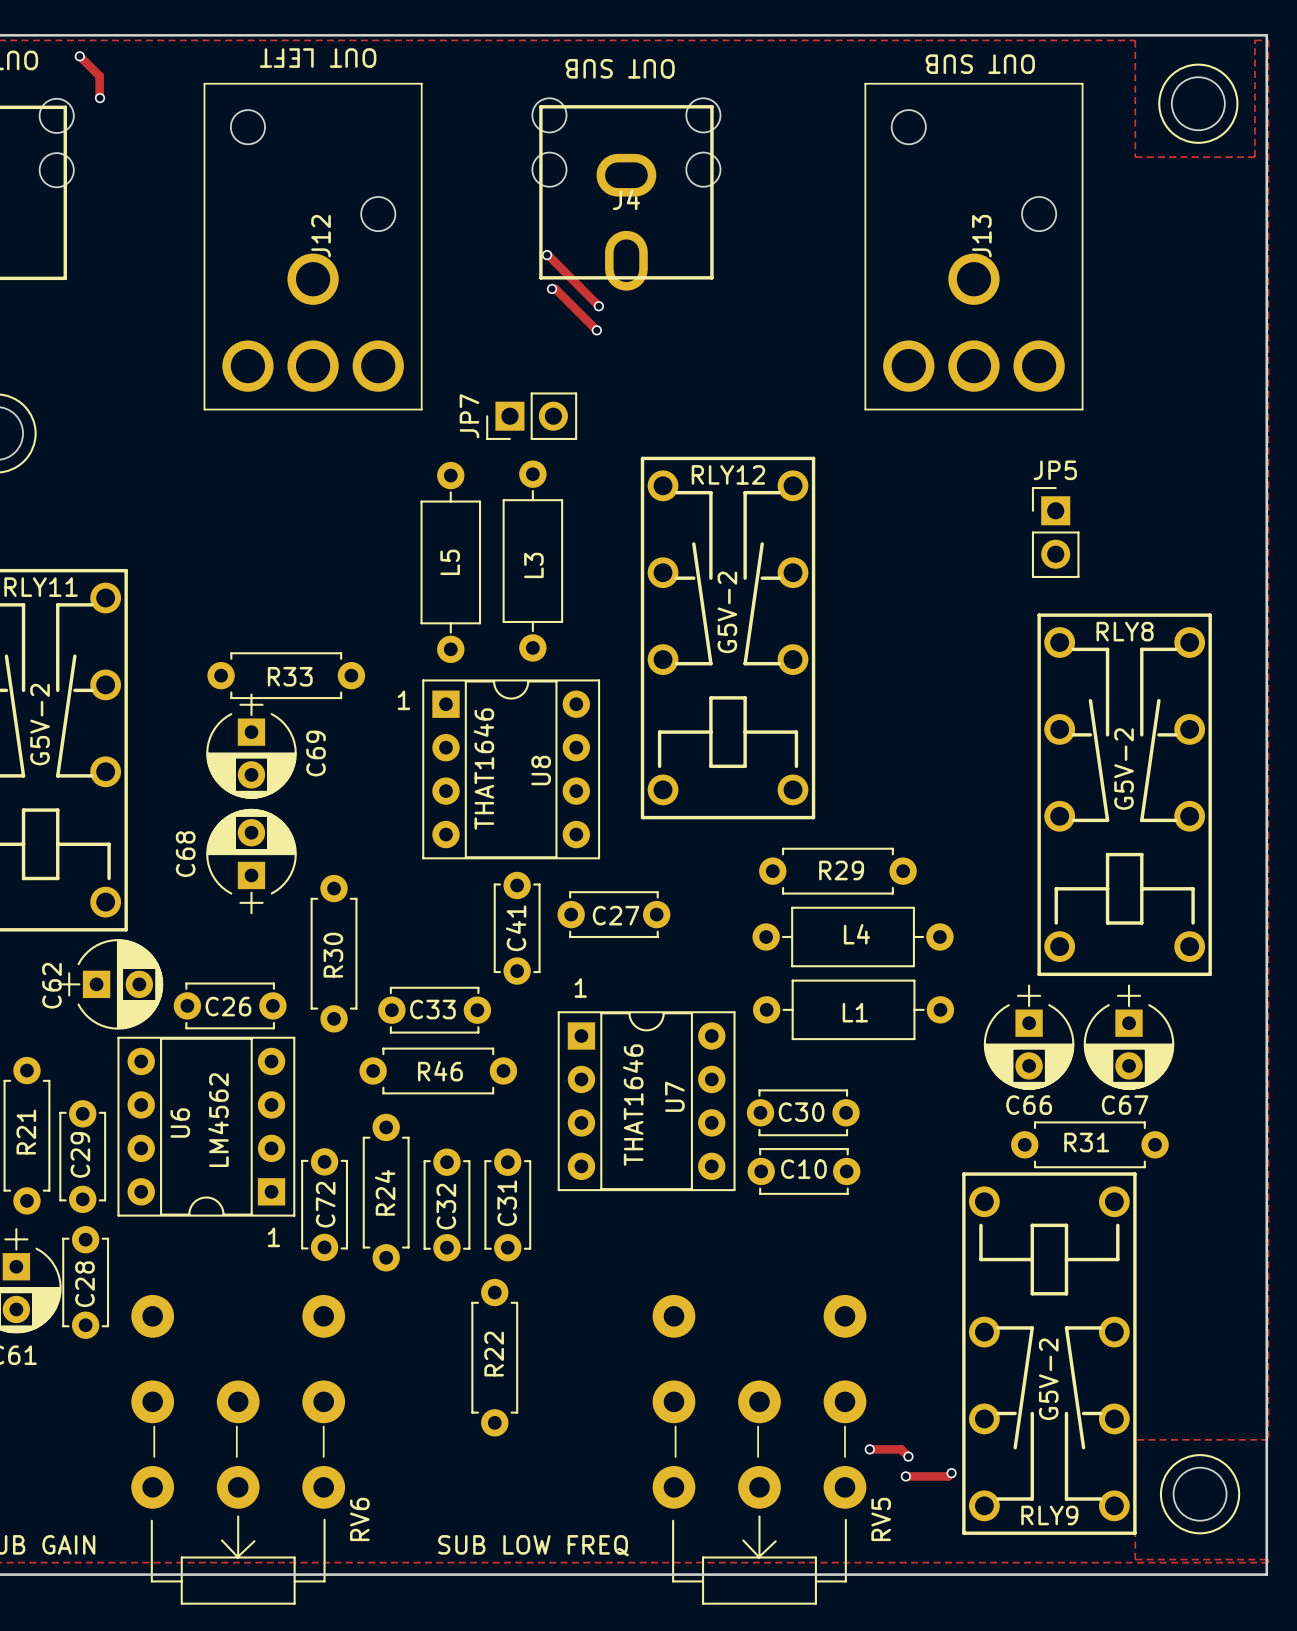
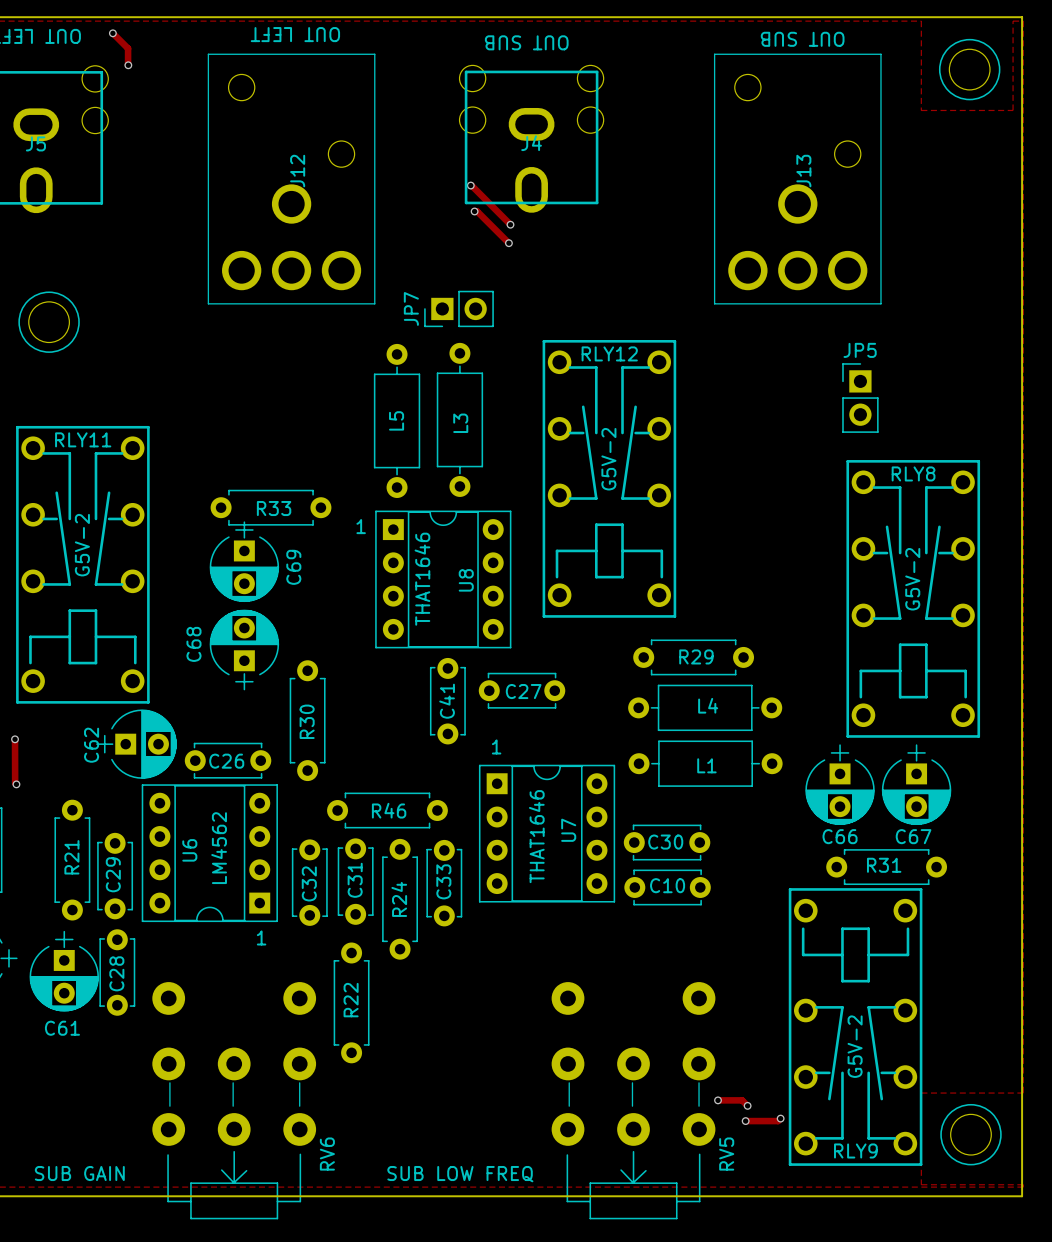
C33 rotation: 0° (434, 1010) -> 90° clockwise (444, 883)
C33 position: (434, 1010) -> (444, 883)
R24 position: (386, 1192) -> (400, 899)
C72: (324, 1204) -> none
C32 position: (446, 1204) -> (309, 882)
C31 position: (507, 1204) -> (355, 881)
R22 position: (494, 1357) -> (351, 1002)

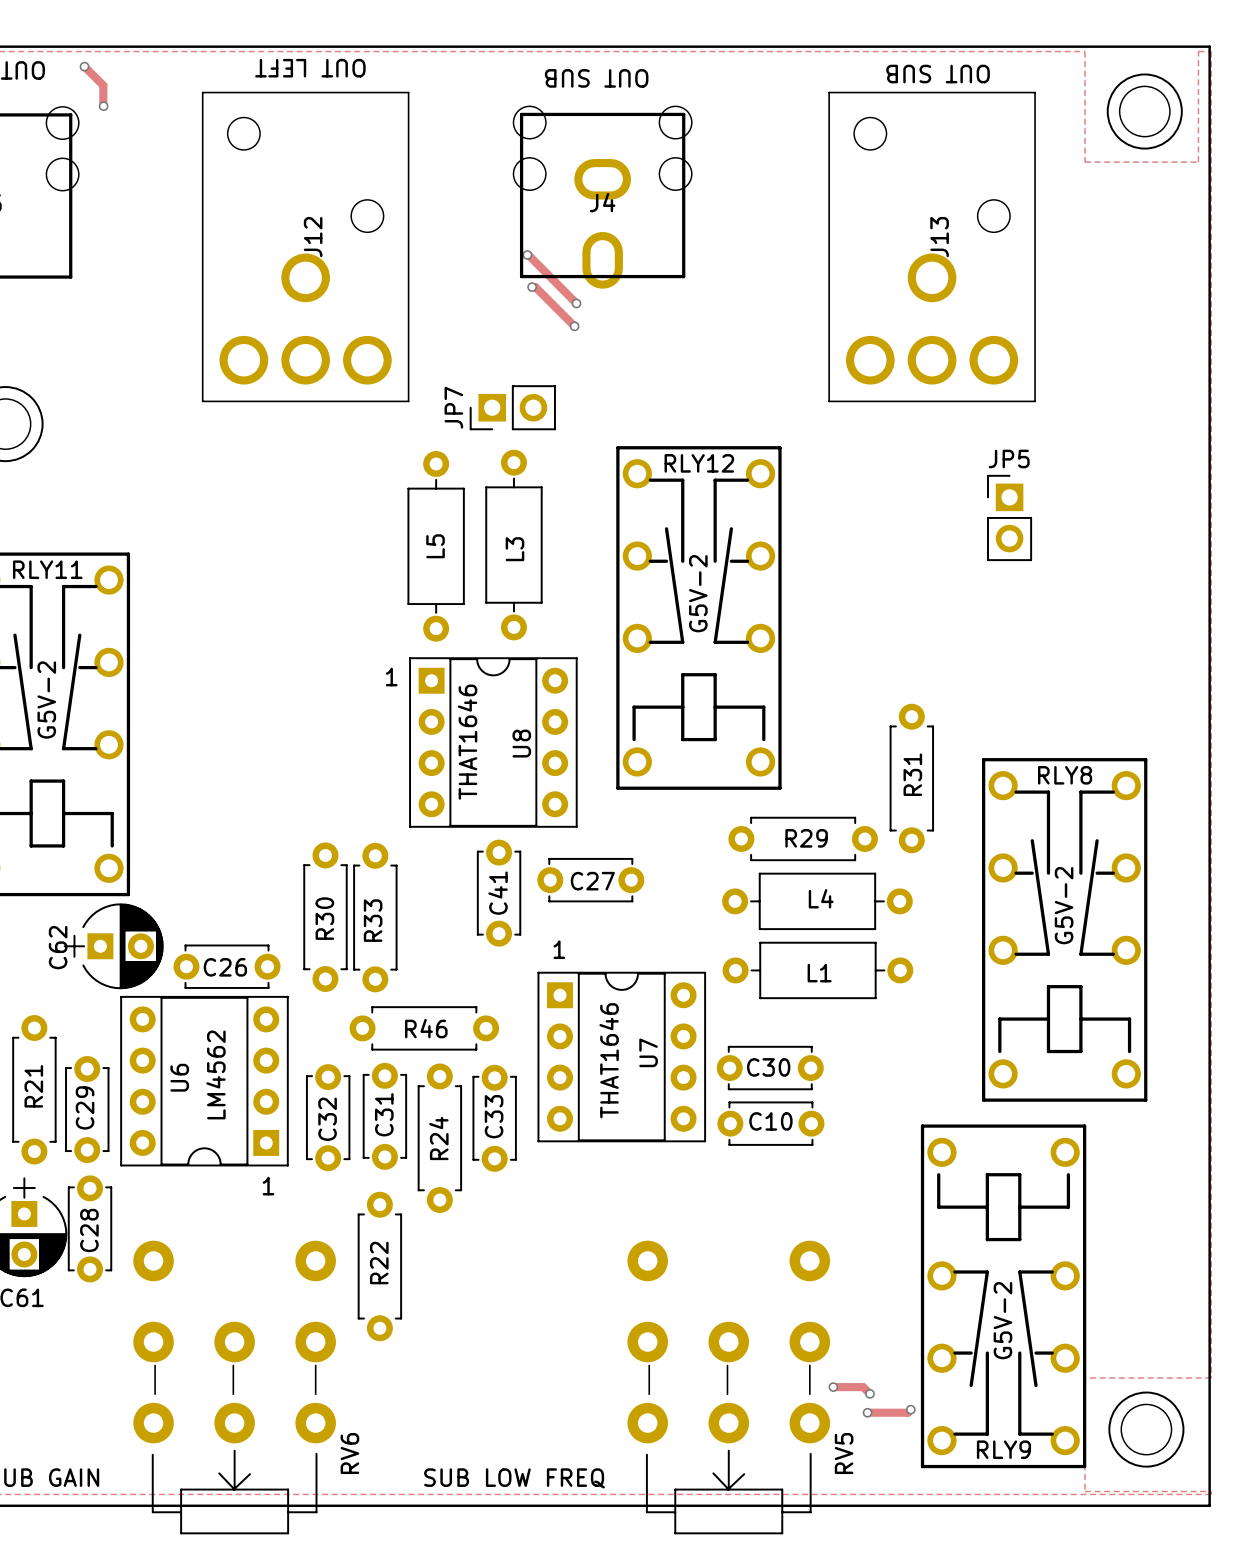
R33 rotation: 0° (271, 507) -> 90° clockwise (375, 917)
R33 position: (271, 507) -> (375, 917)
C69: (244, 561) -> none
RLY8 position: (913, 598) -> (1064, 929)
C68: (244, 650) -> none
C66: (840, 784) -> none
C67: (916, 784) -> none
R31 rotation: 0° (886, 867) -> 90° clockwise (911, 778)
R31 position: (886, 867) -> (911, 778)

